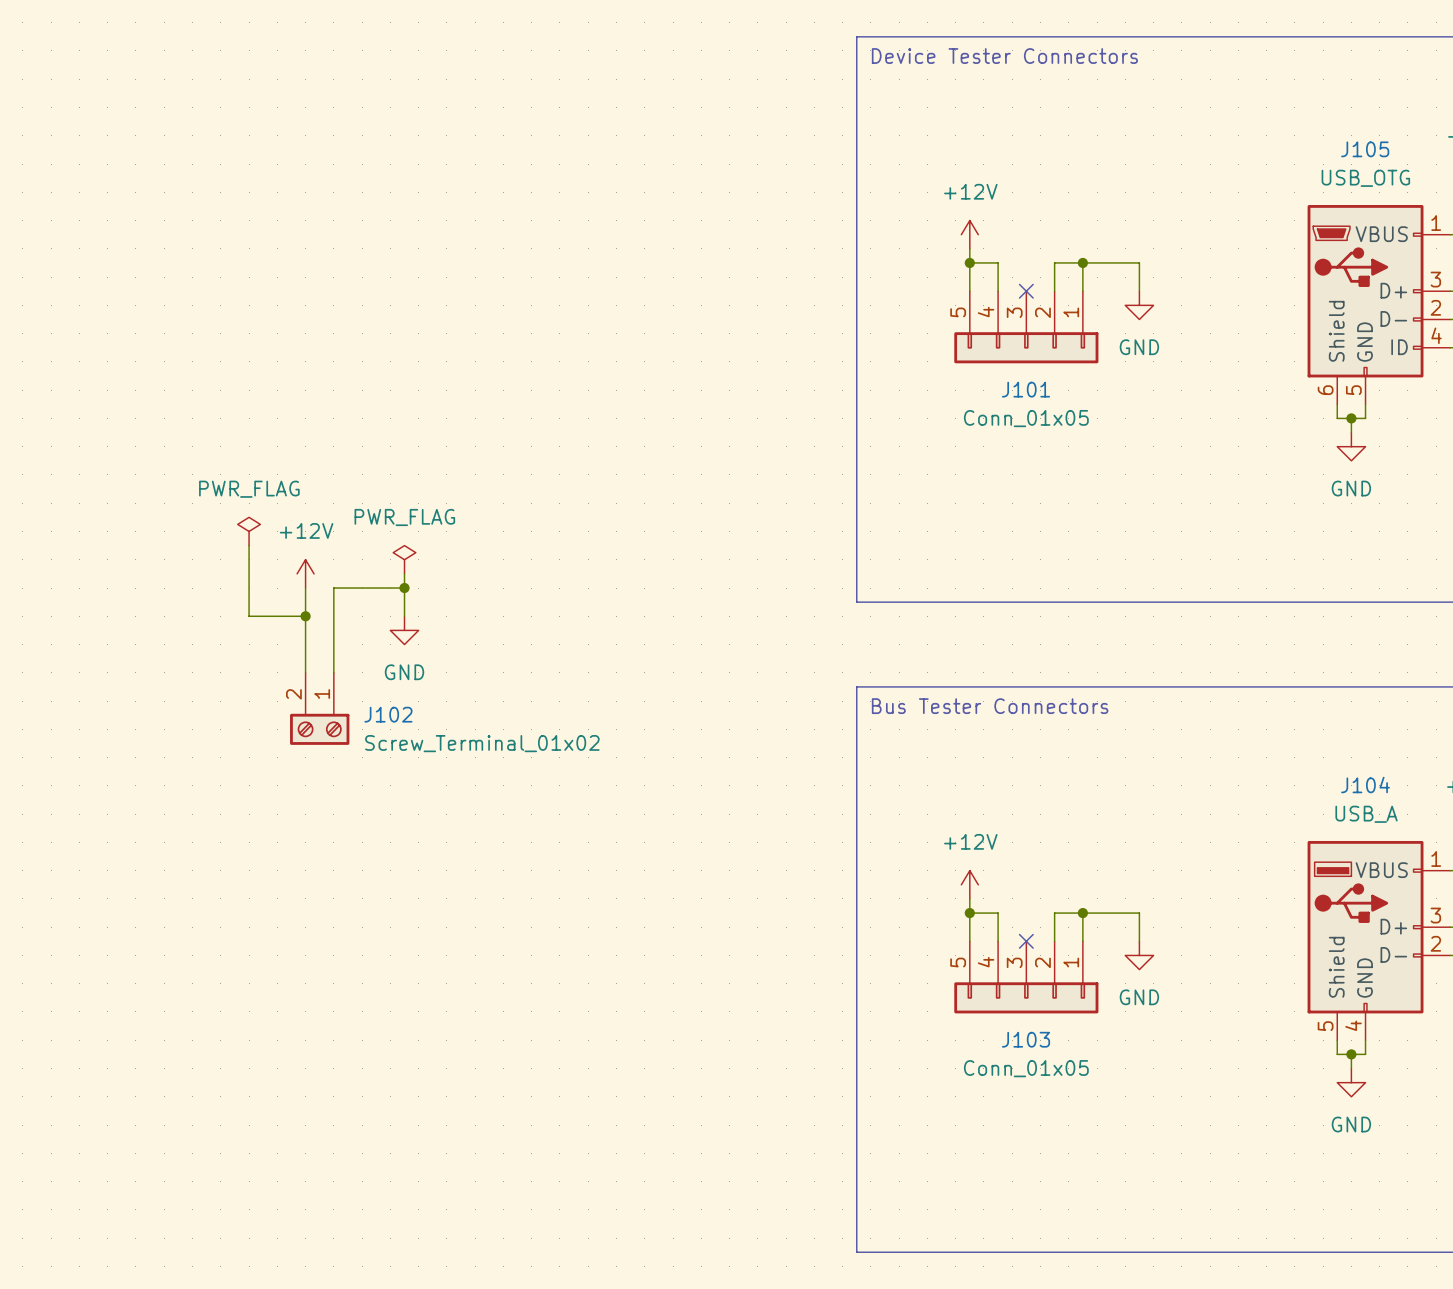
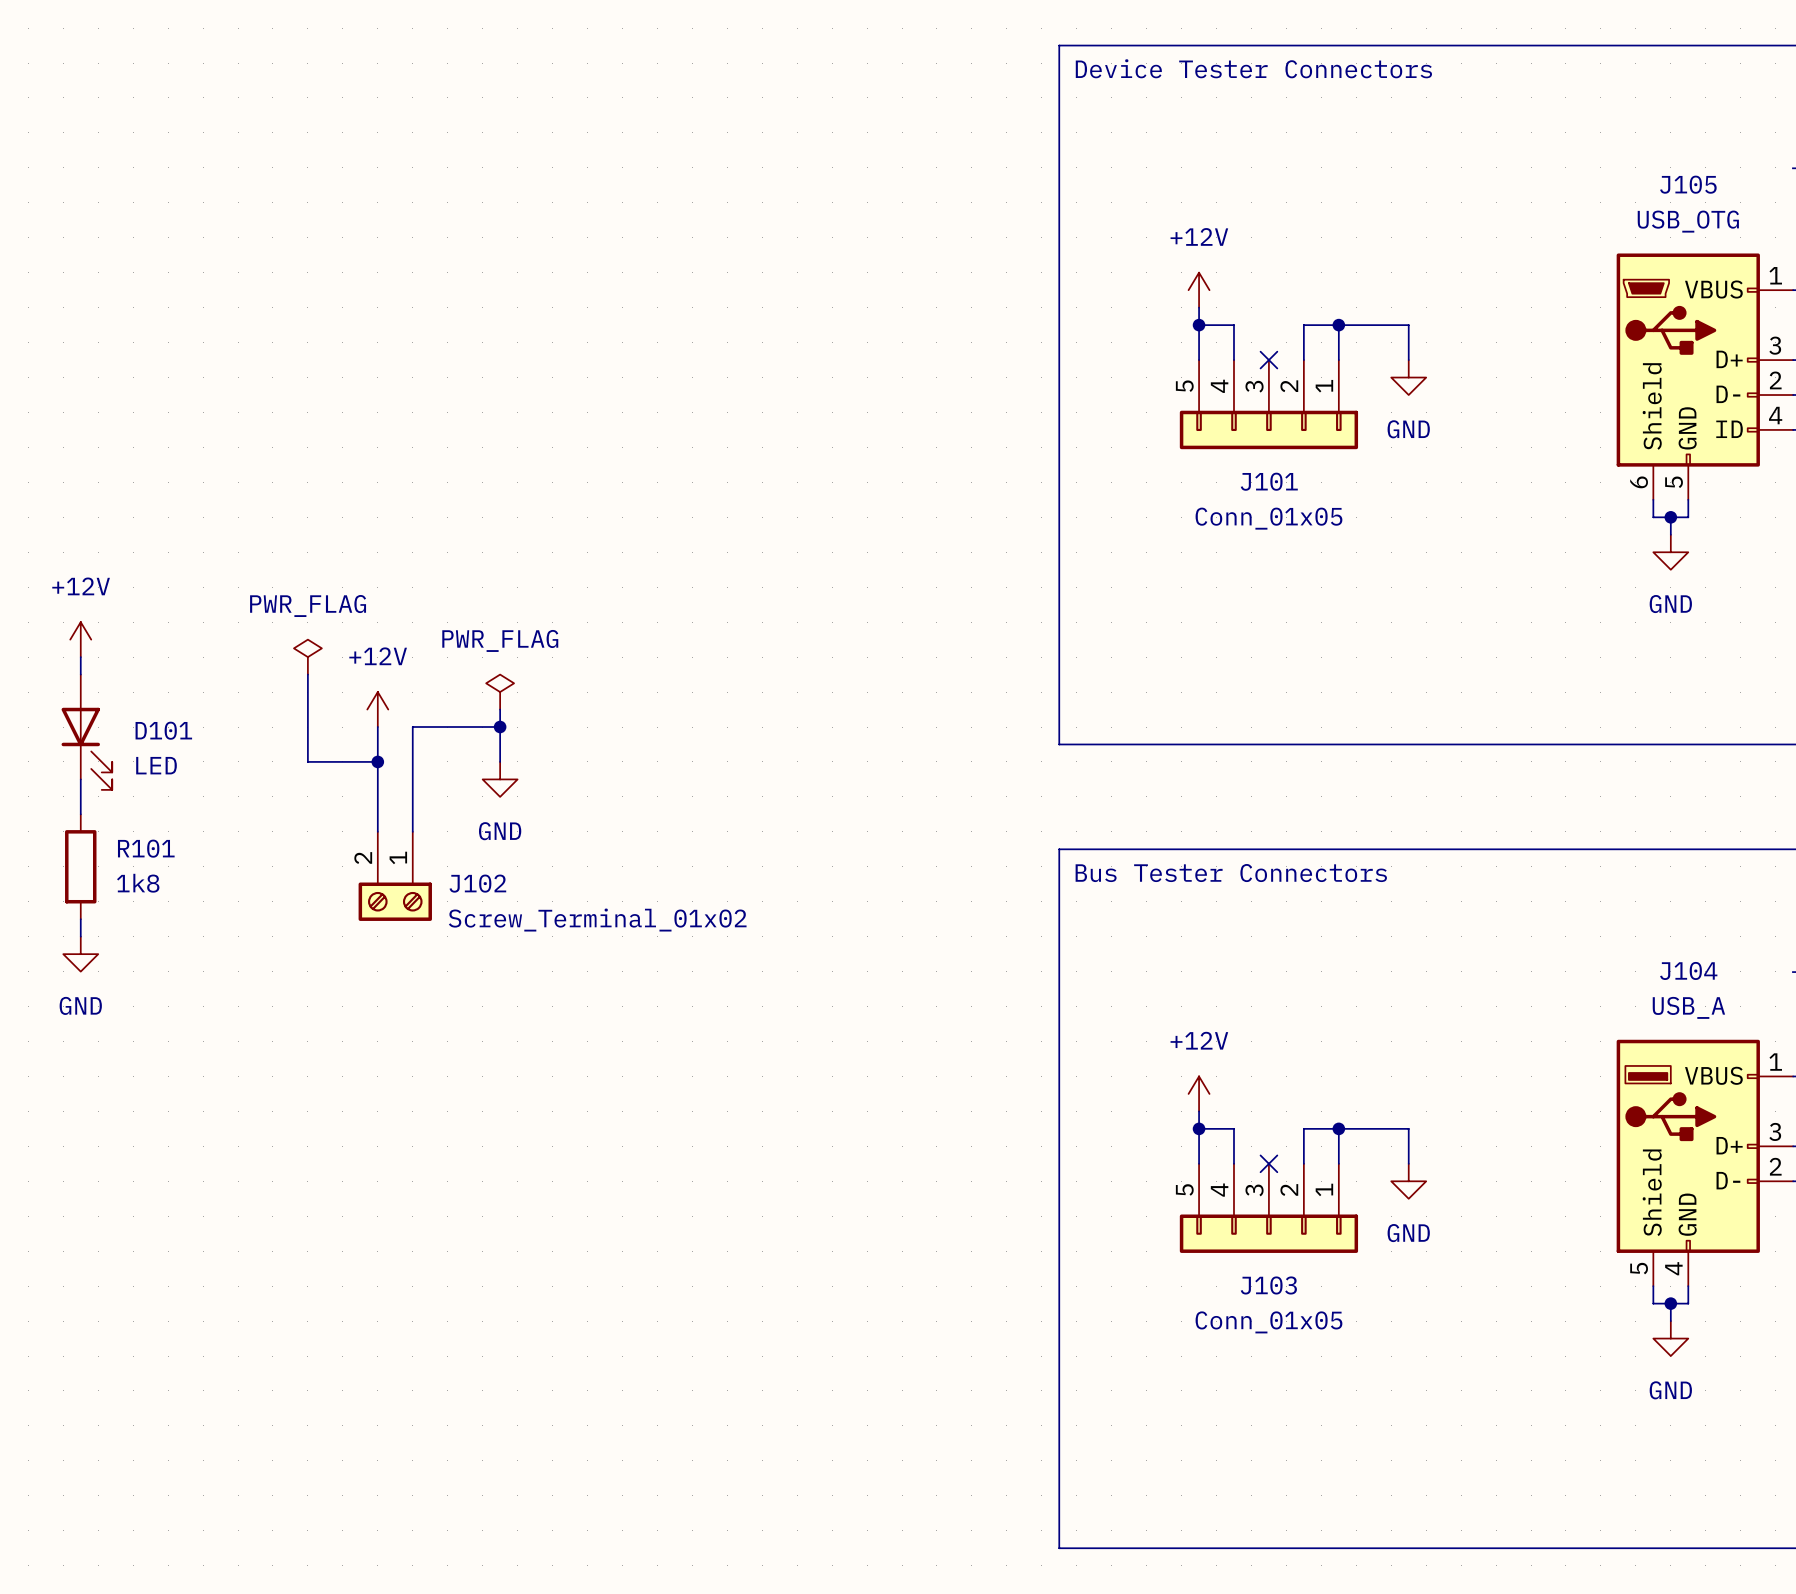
power symbol: none -> +12V (80, 639)
wire: none -> (80, 657) (80, 674)
D101: none -> LED (86, 732)
wire: none -> (80, 779) (80, 814)
R101: none -> 1k8 (80, 866)
wire: none -> (80, 919) (80, 936)
power symbol: none -> GND (80, 954)

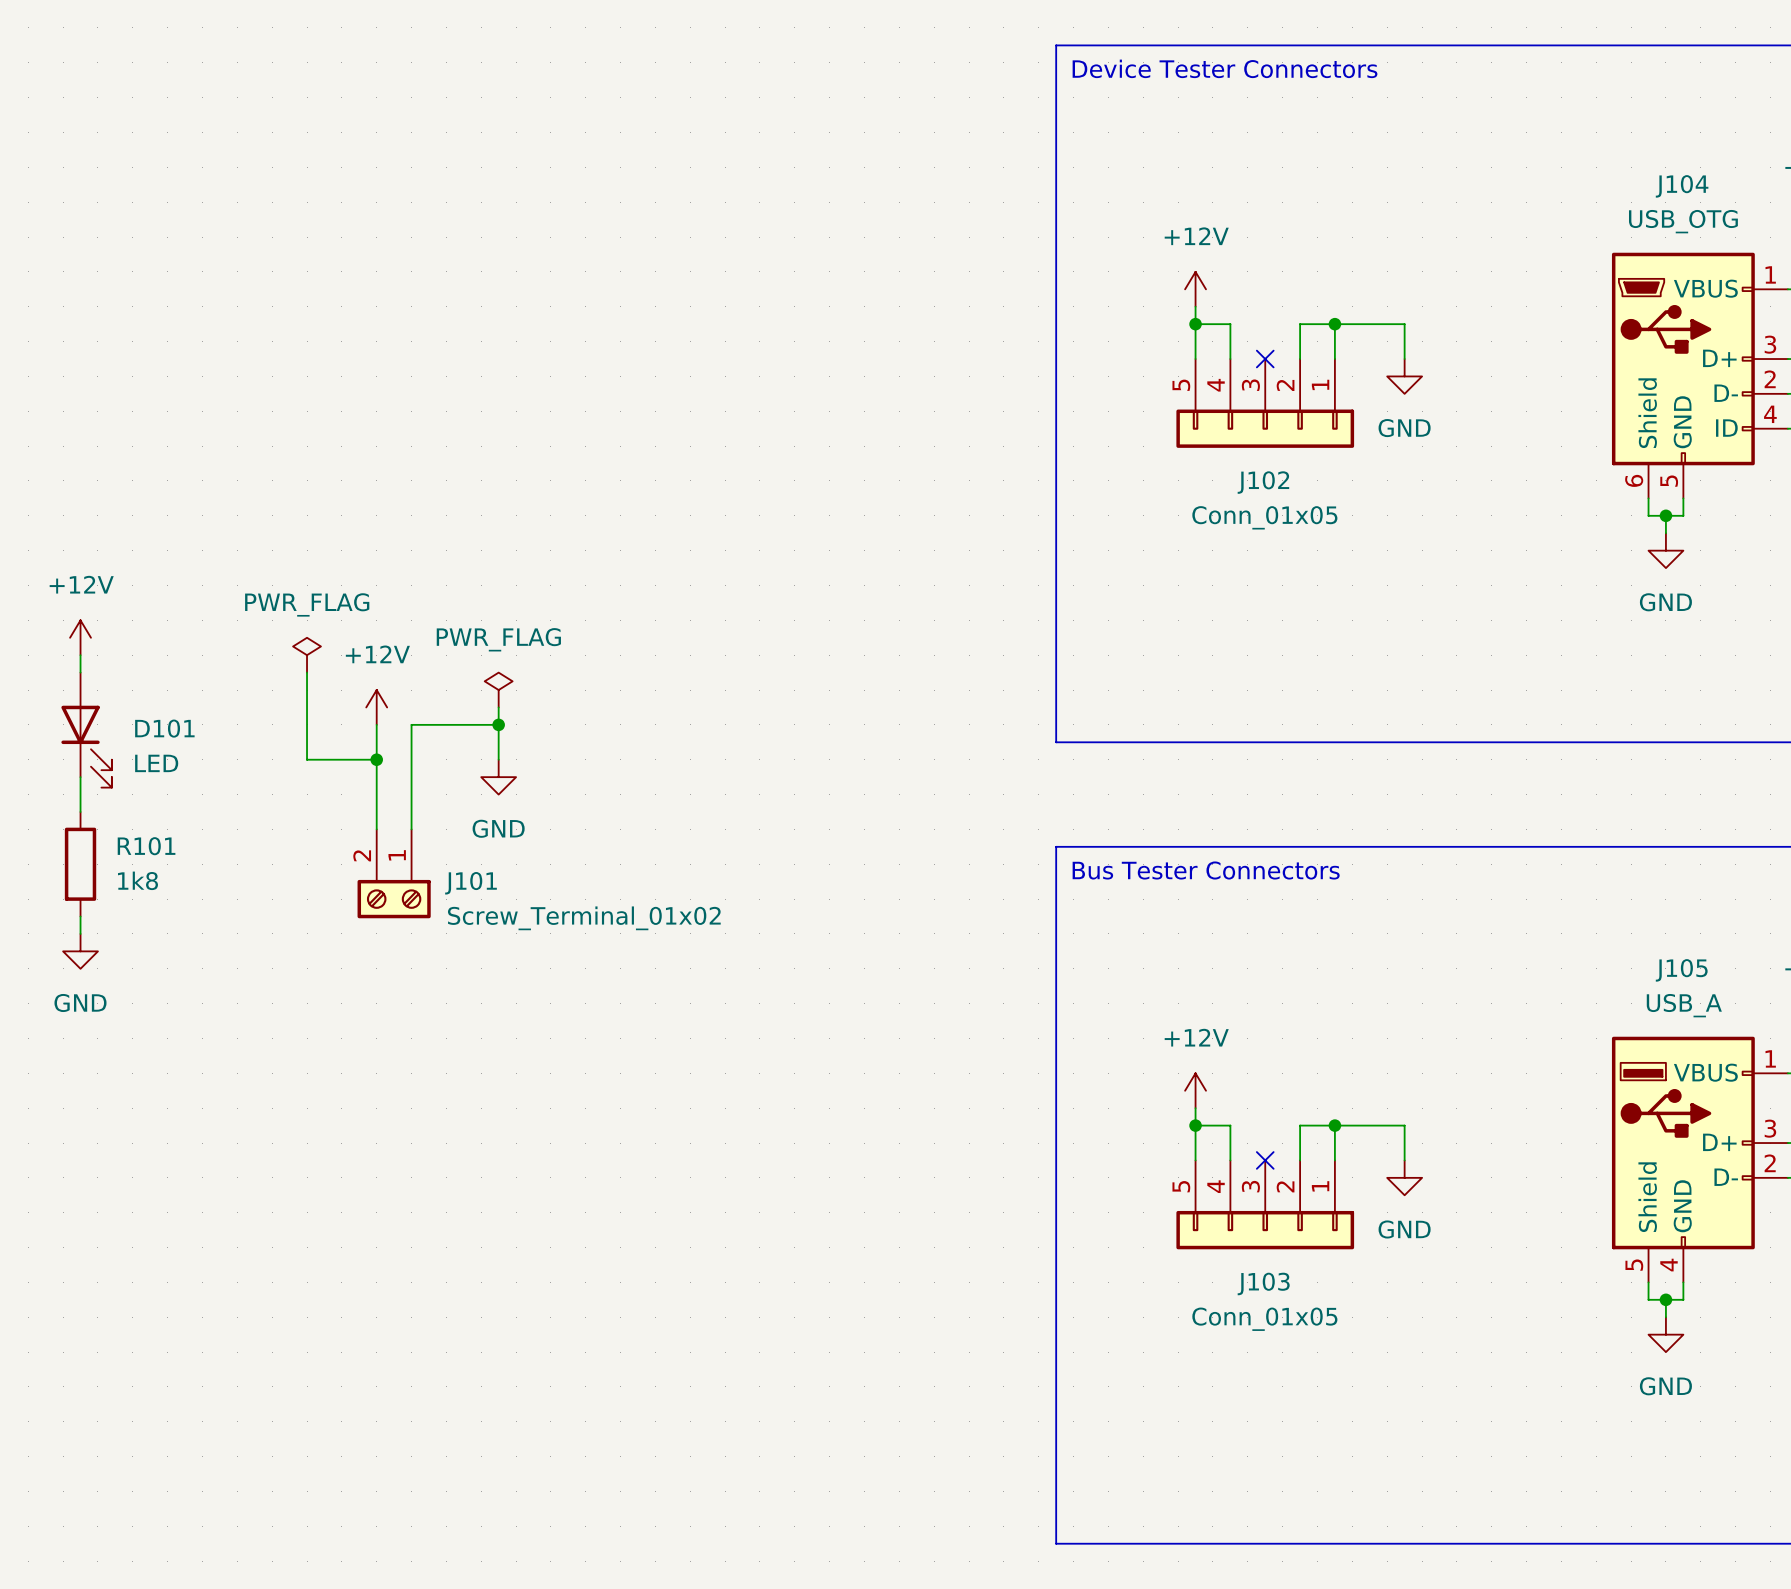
J105 name: J105 (1688, 184) -> J104 (1682, 186)
J101 name: J101 (1269, 481) -> J102 (1263, 482)
J102 name: J102 (477, 883) -> J101 (471, 883)
J104 name: J104 (1688, 970) -> J105 (1681, 970)

